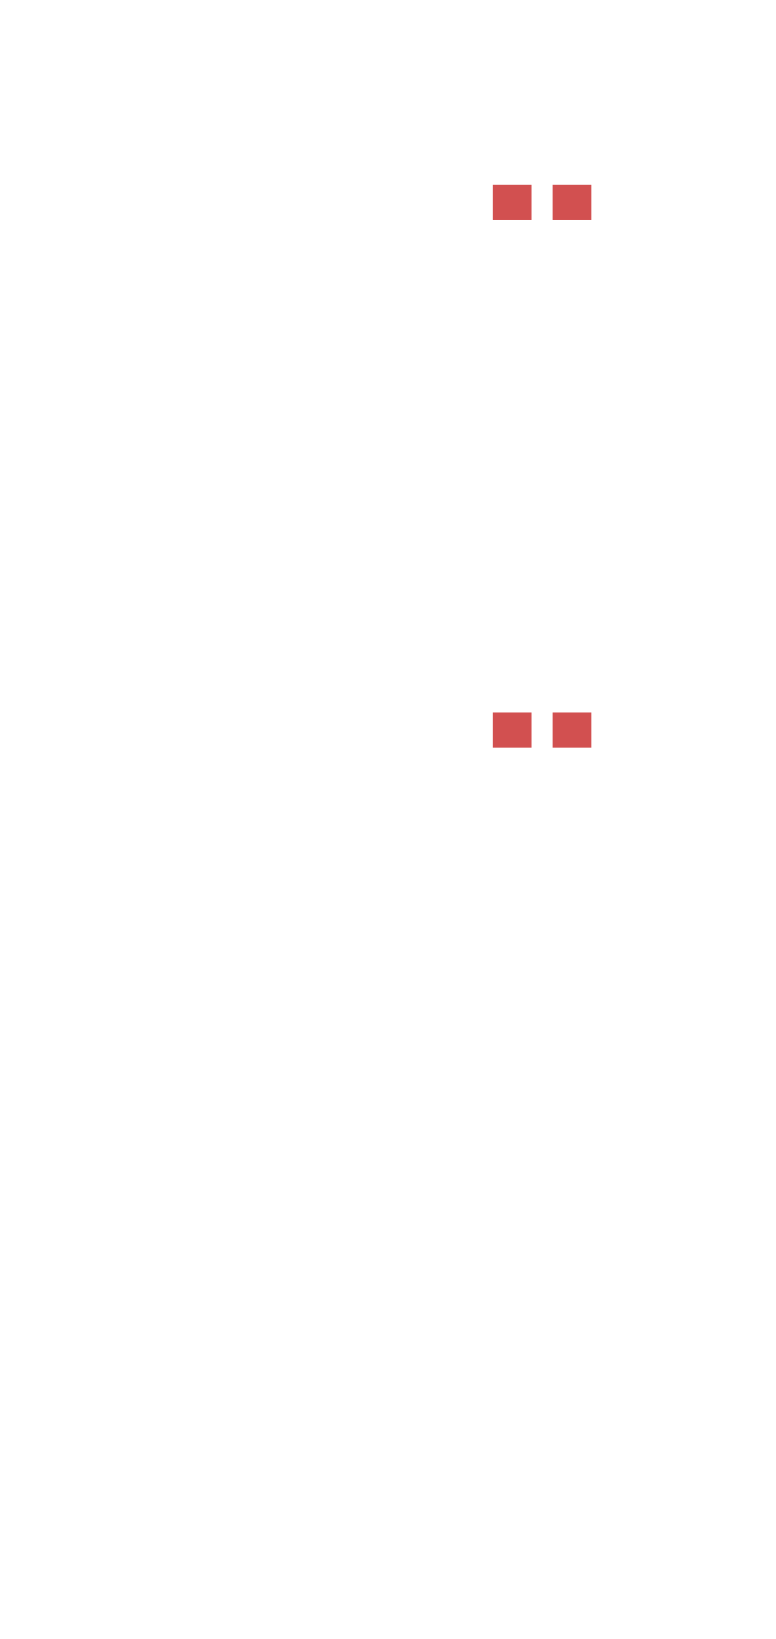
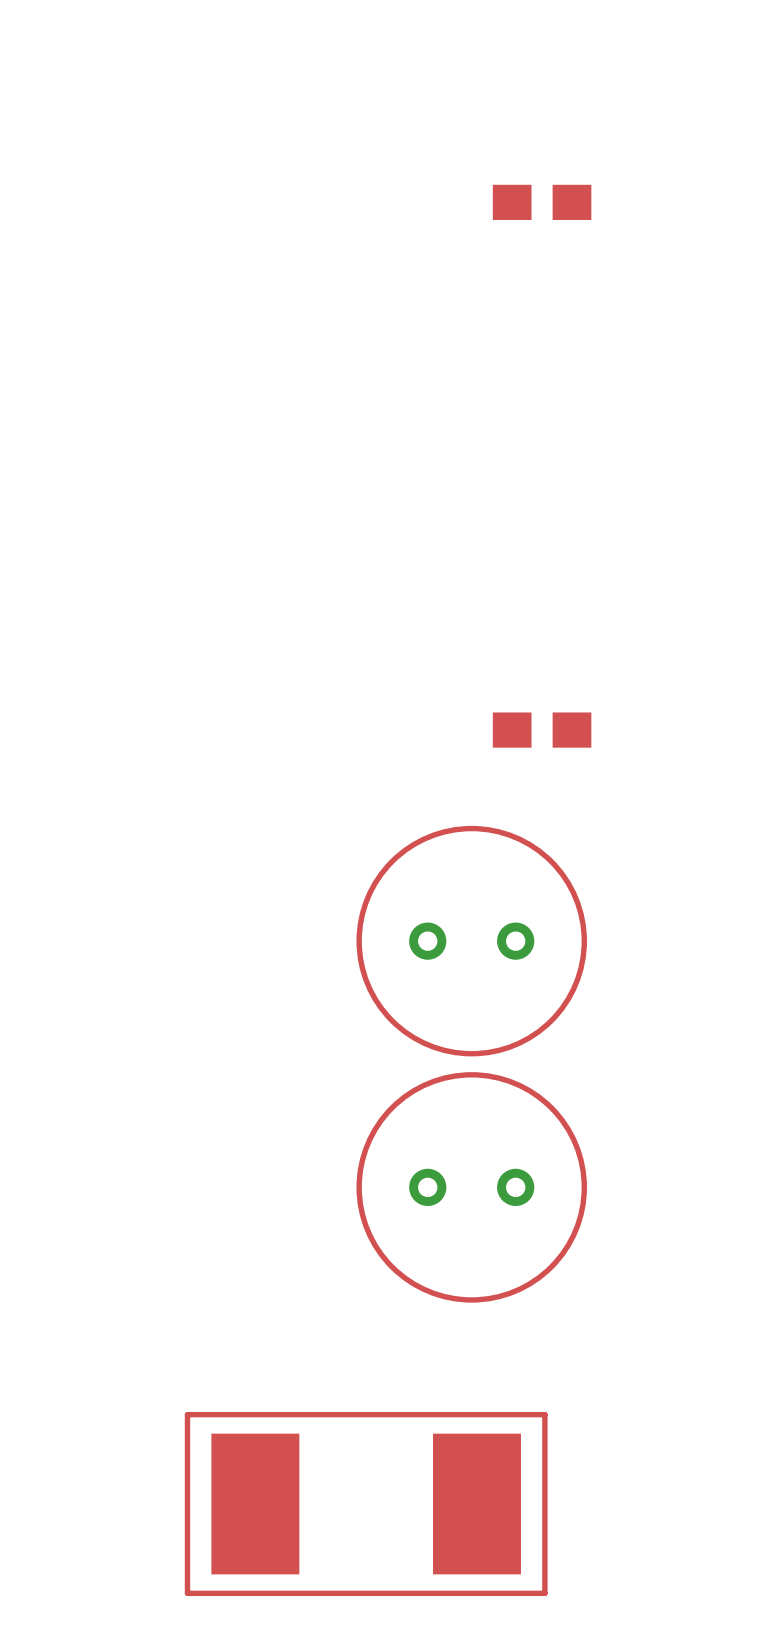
part: none -> (471, 941)
part: none -> (471, 1187)
part: none -> (366, 1504)

